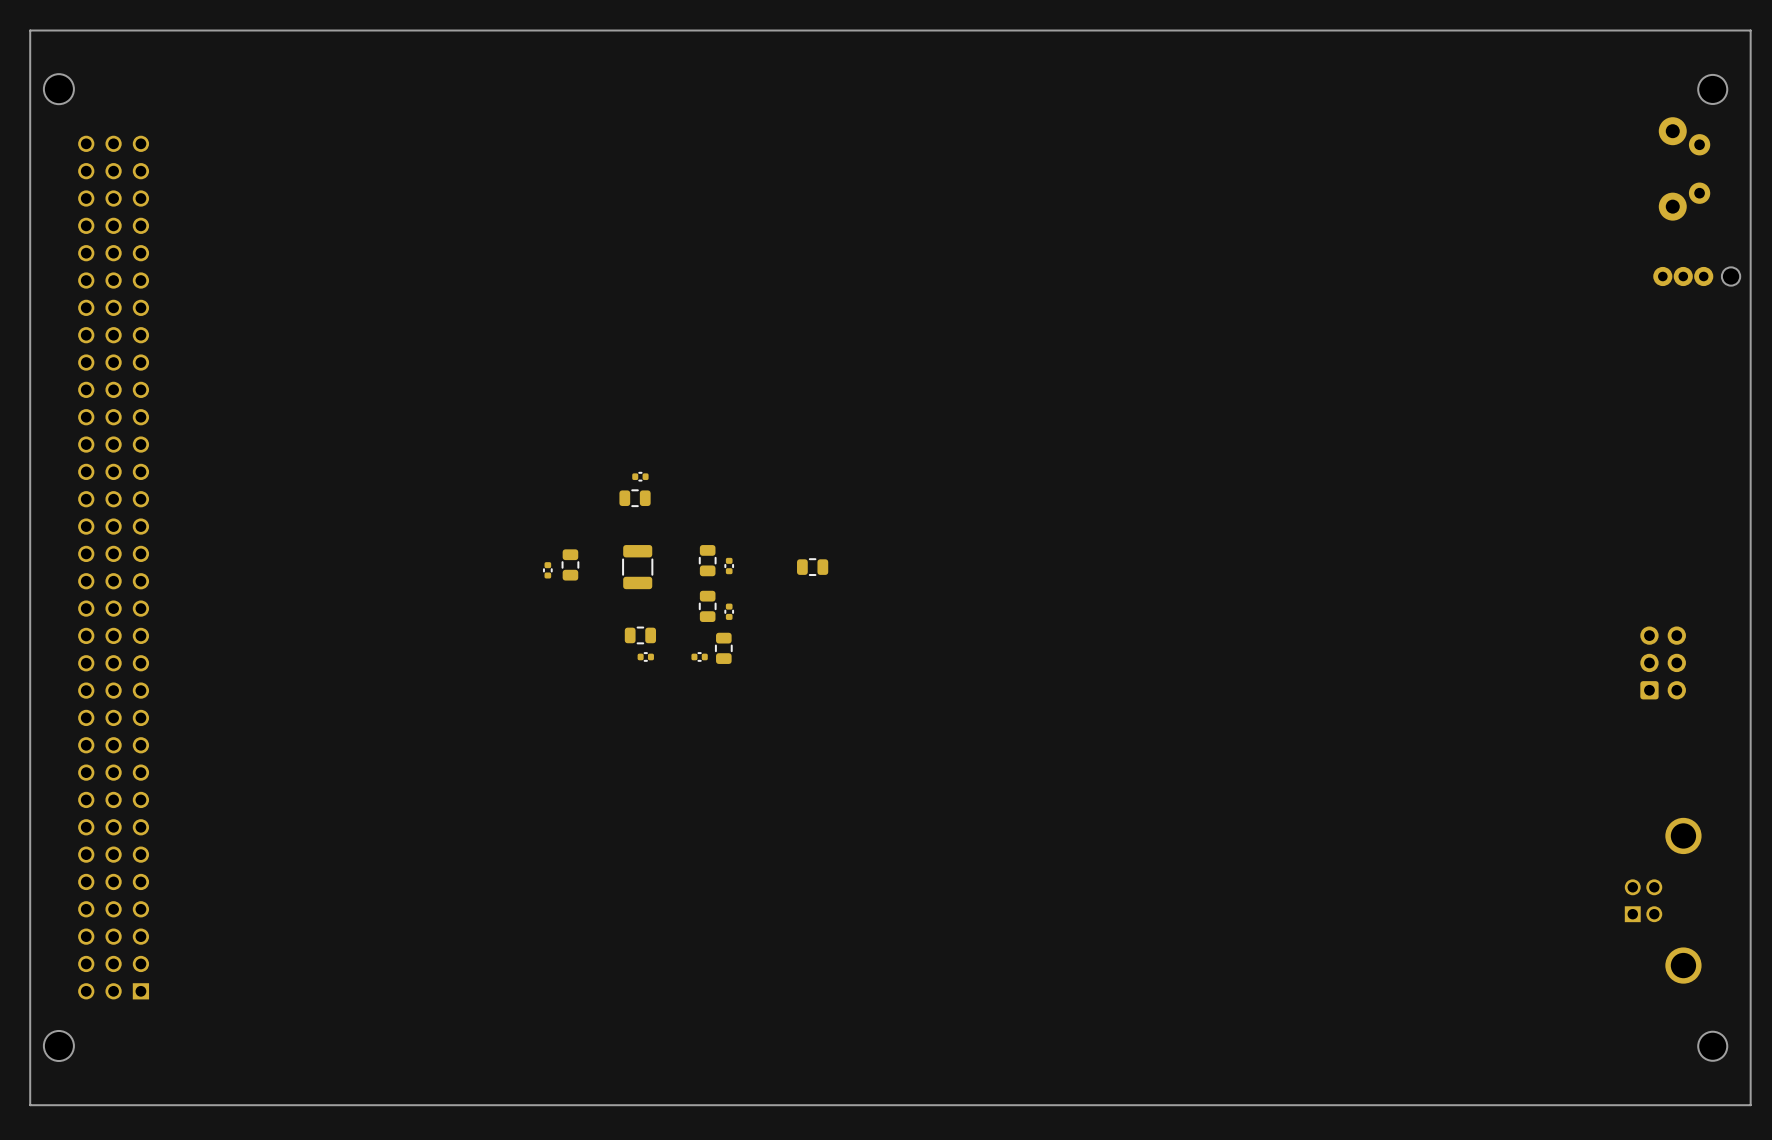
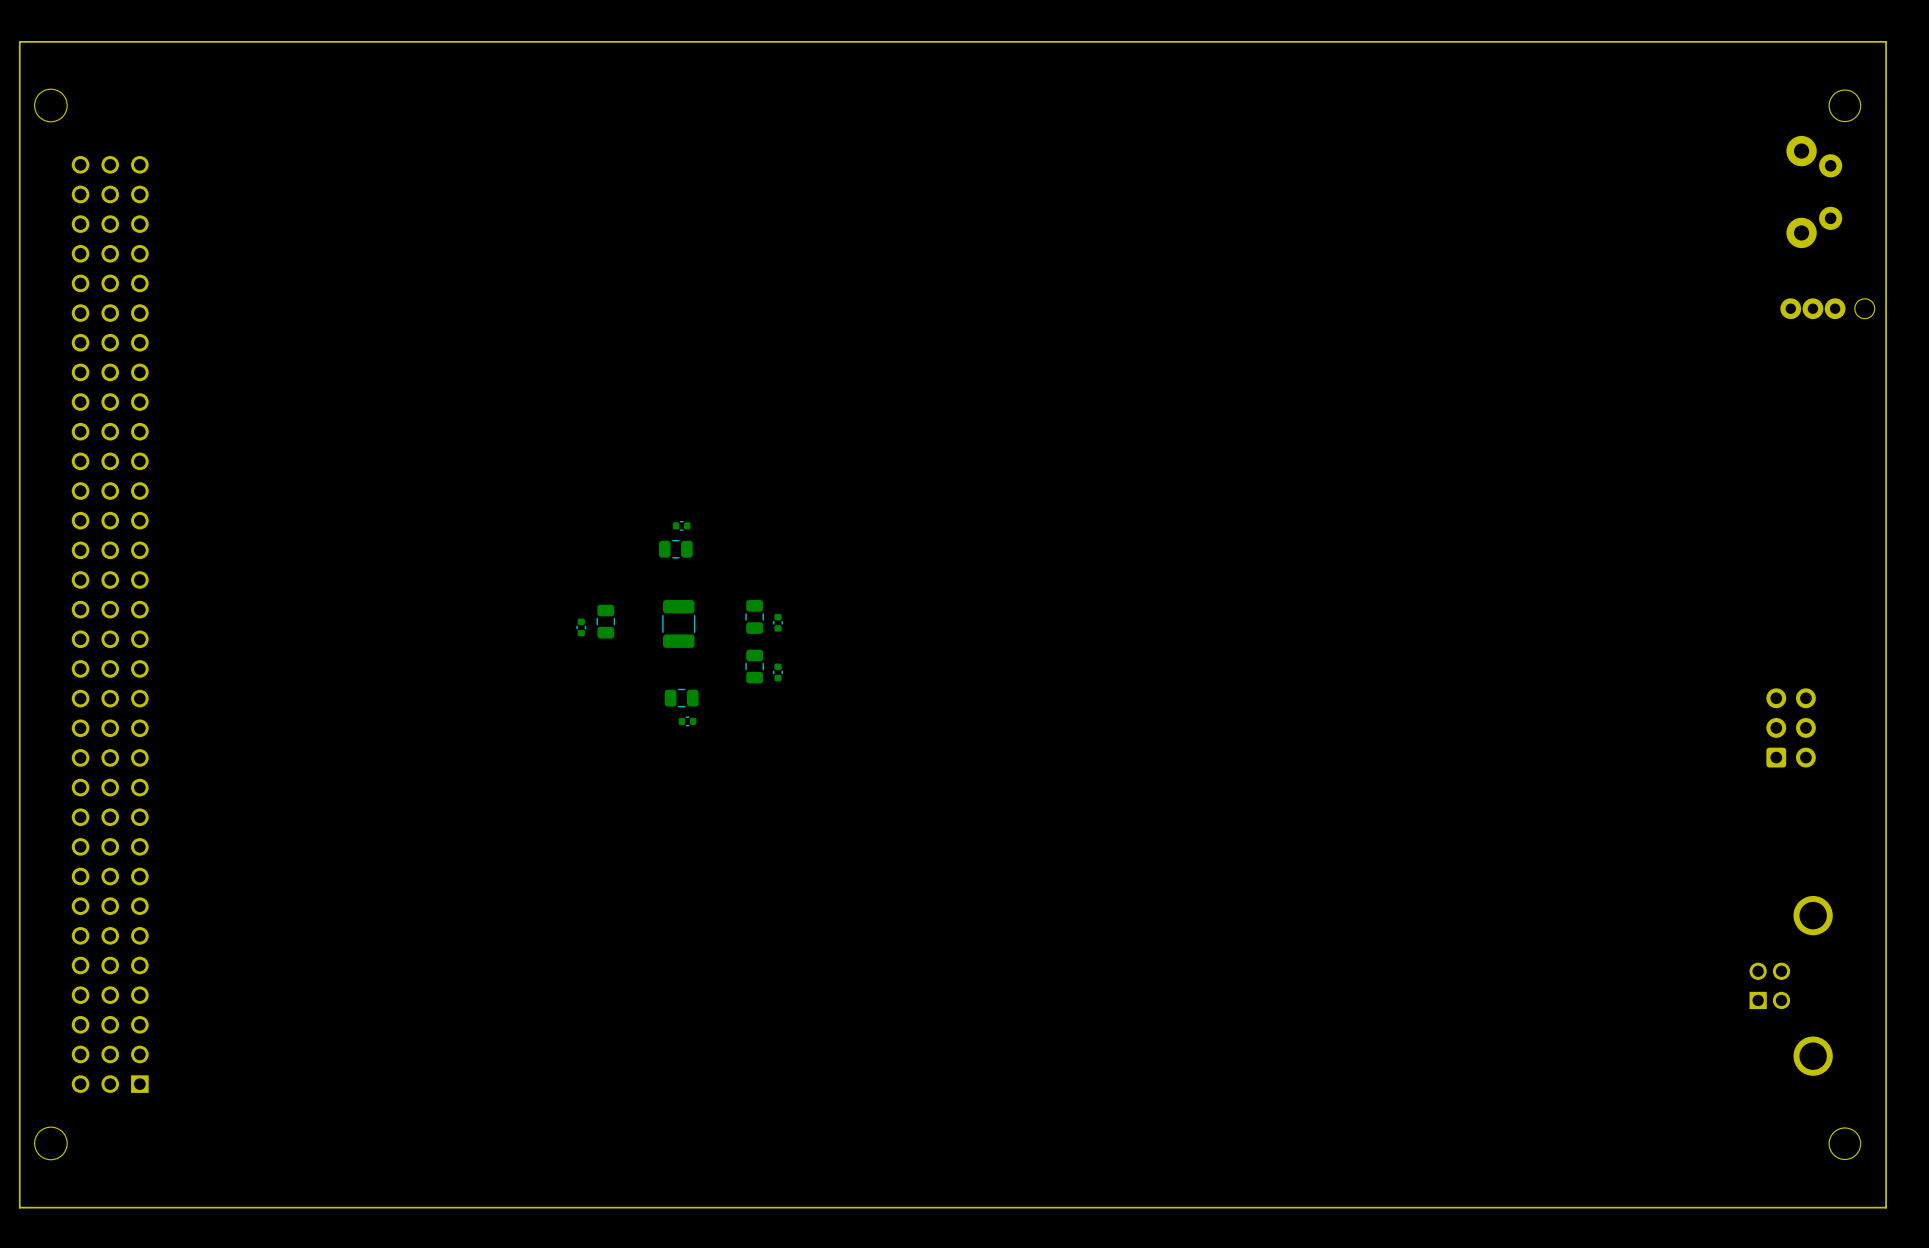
part: (812, 567) -> none
part: (723, 648) -> none
part: (699, 656) -> none

